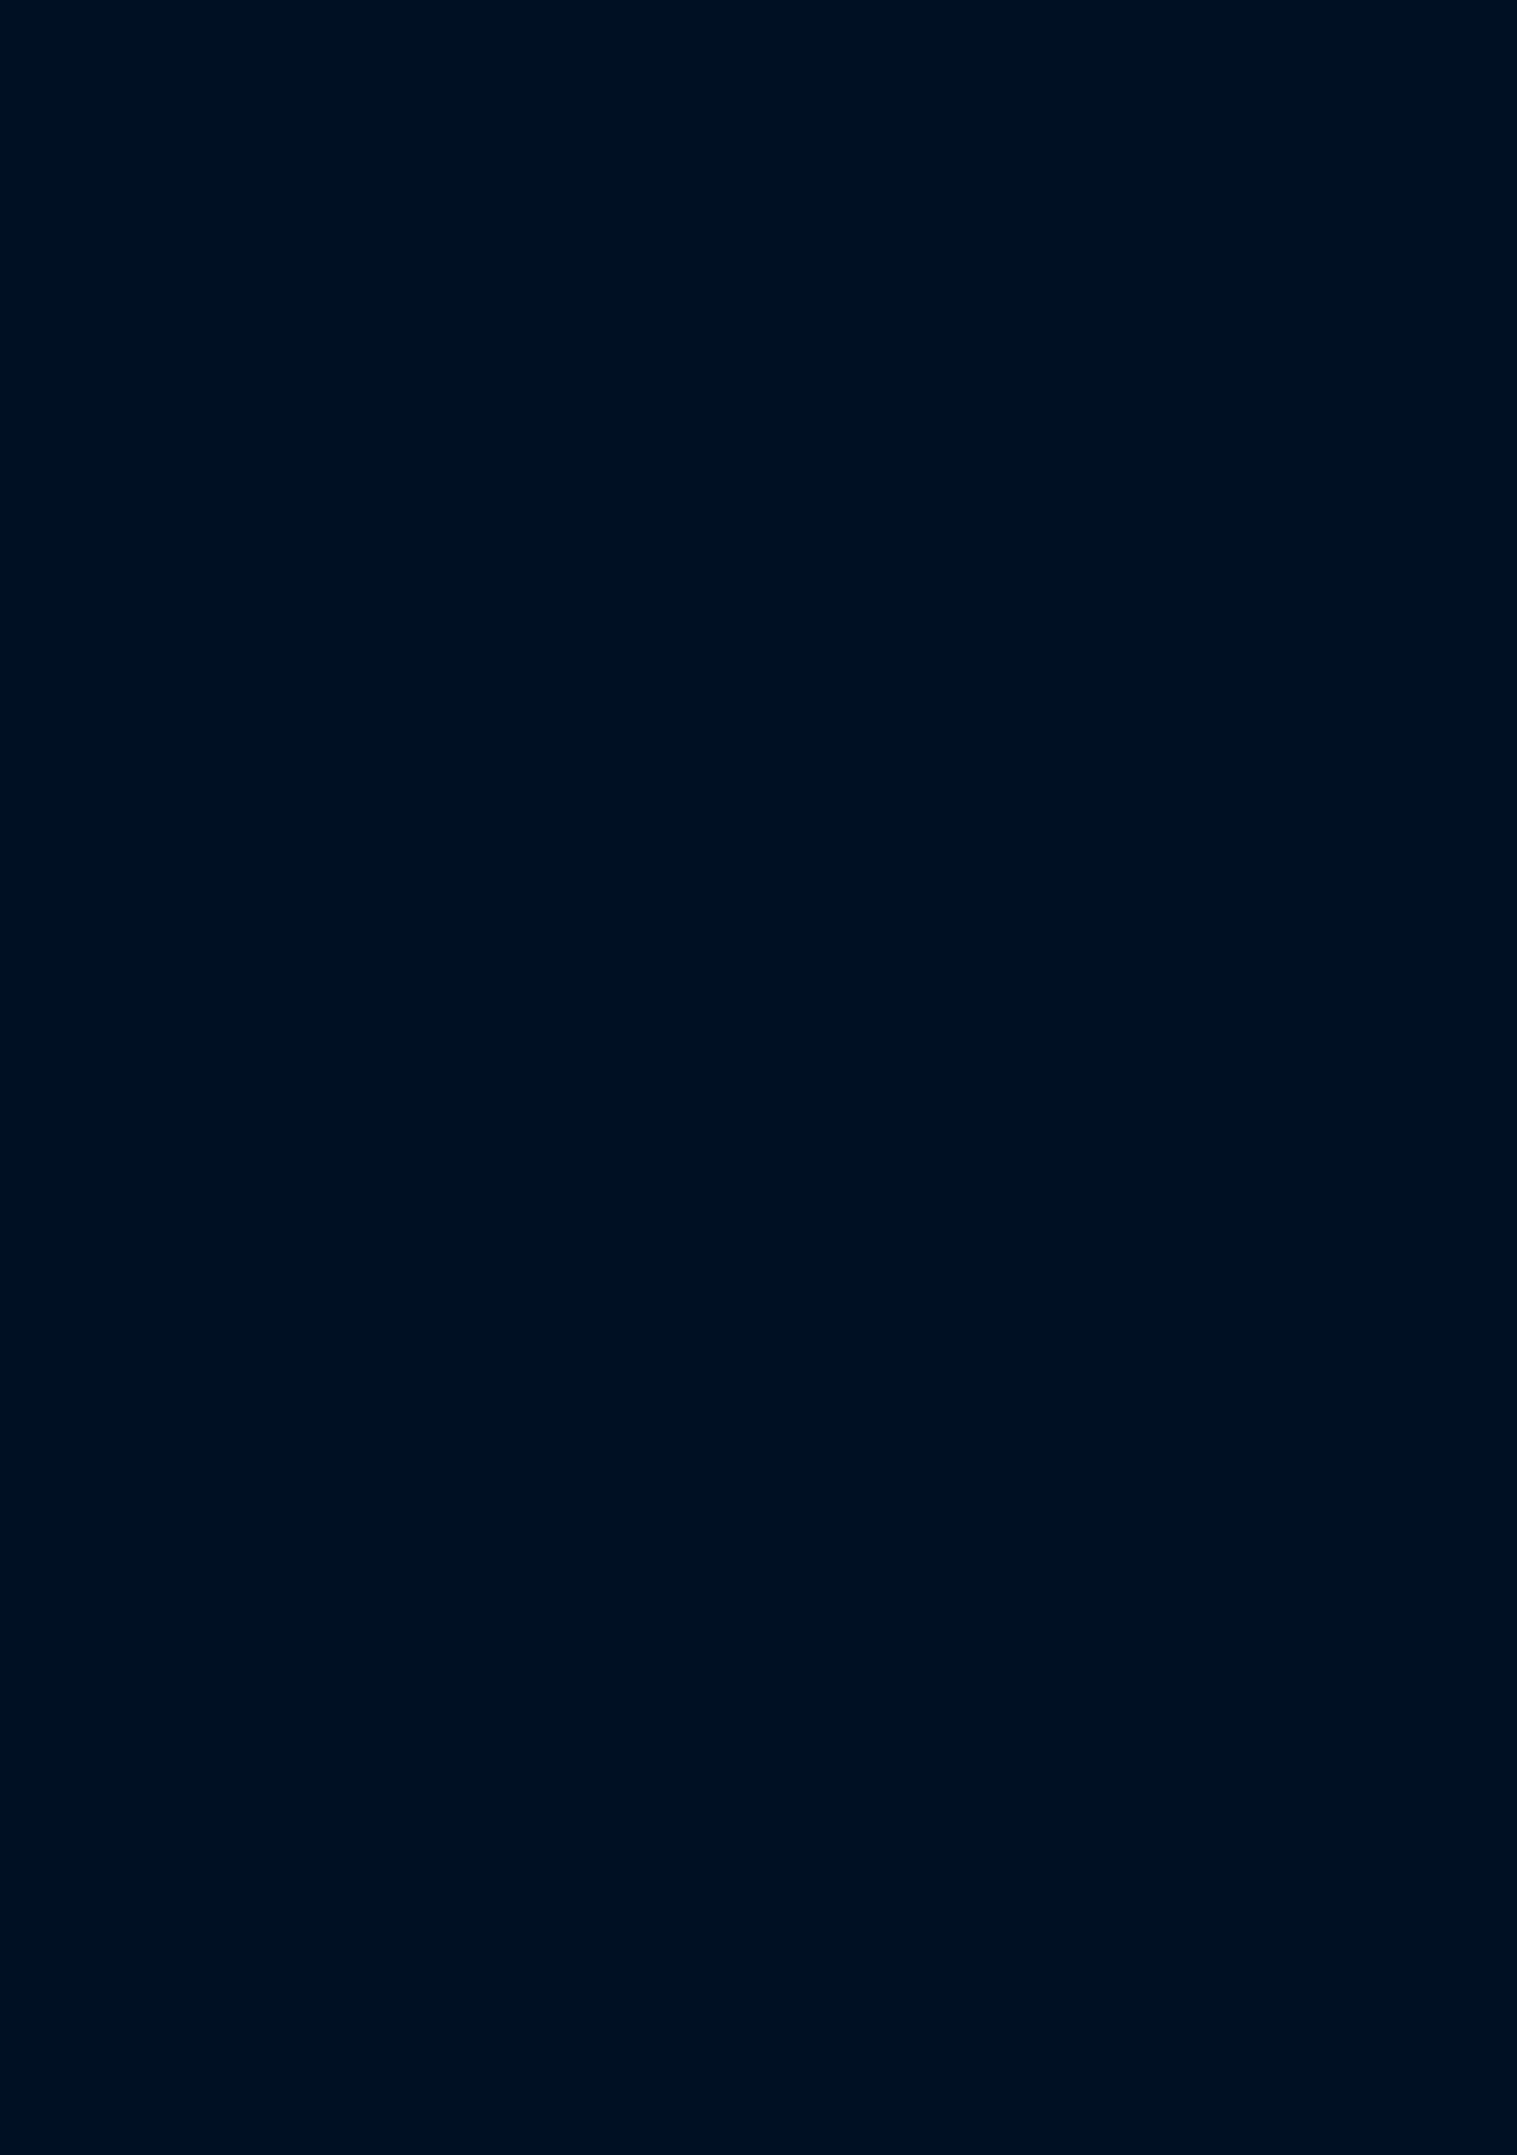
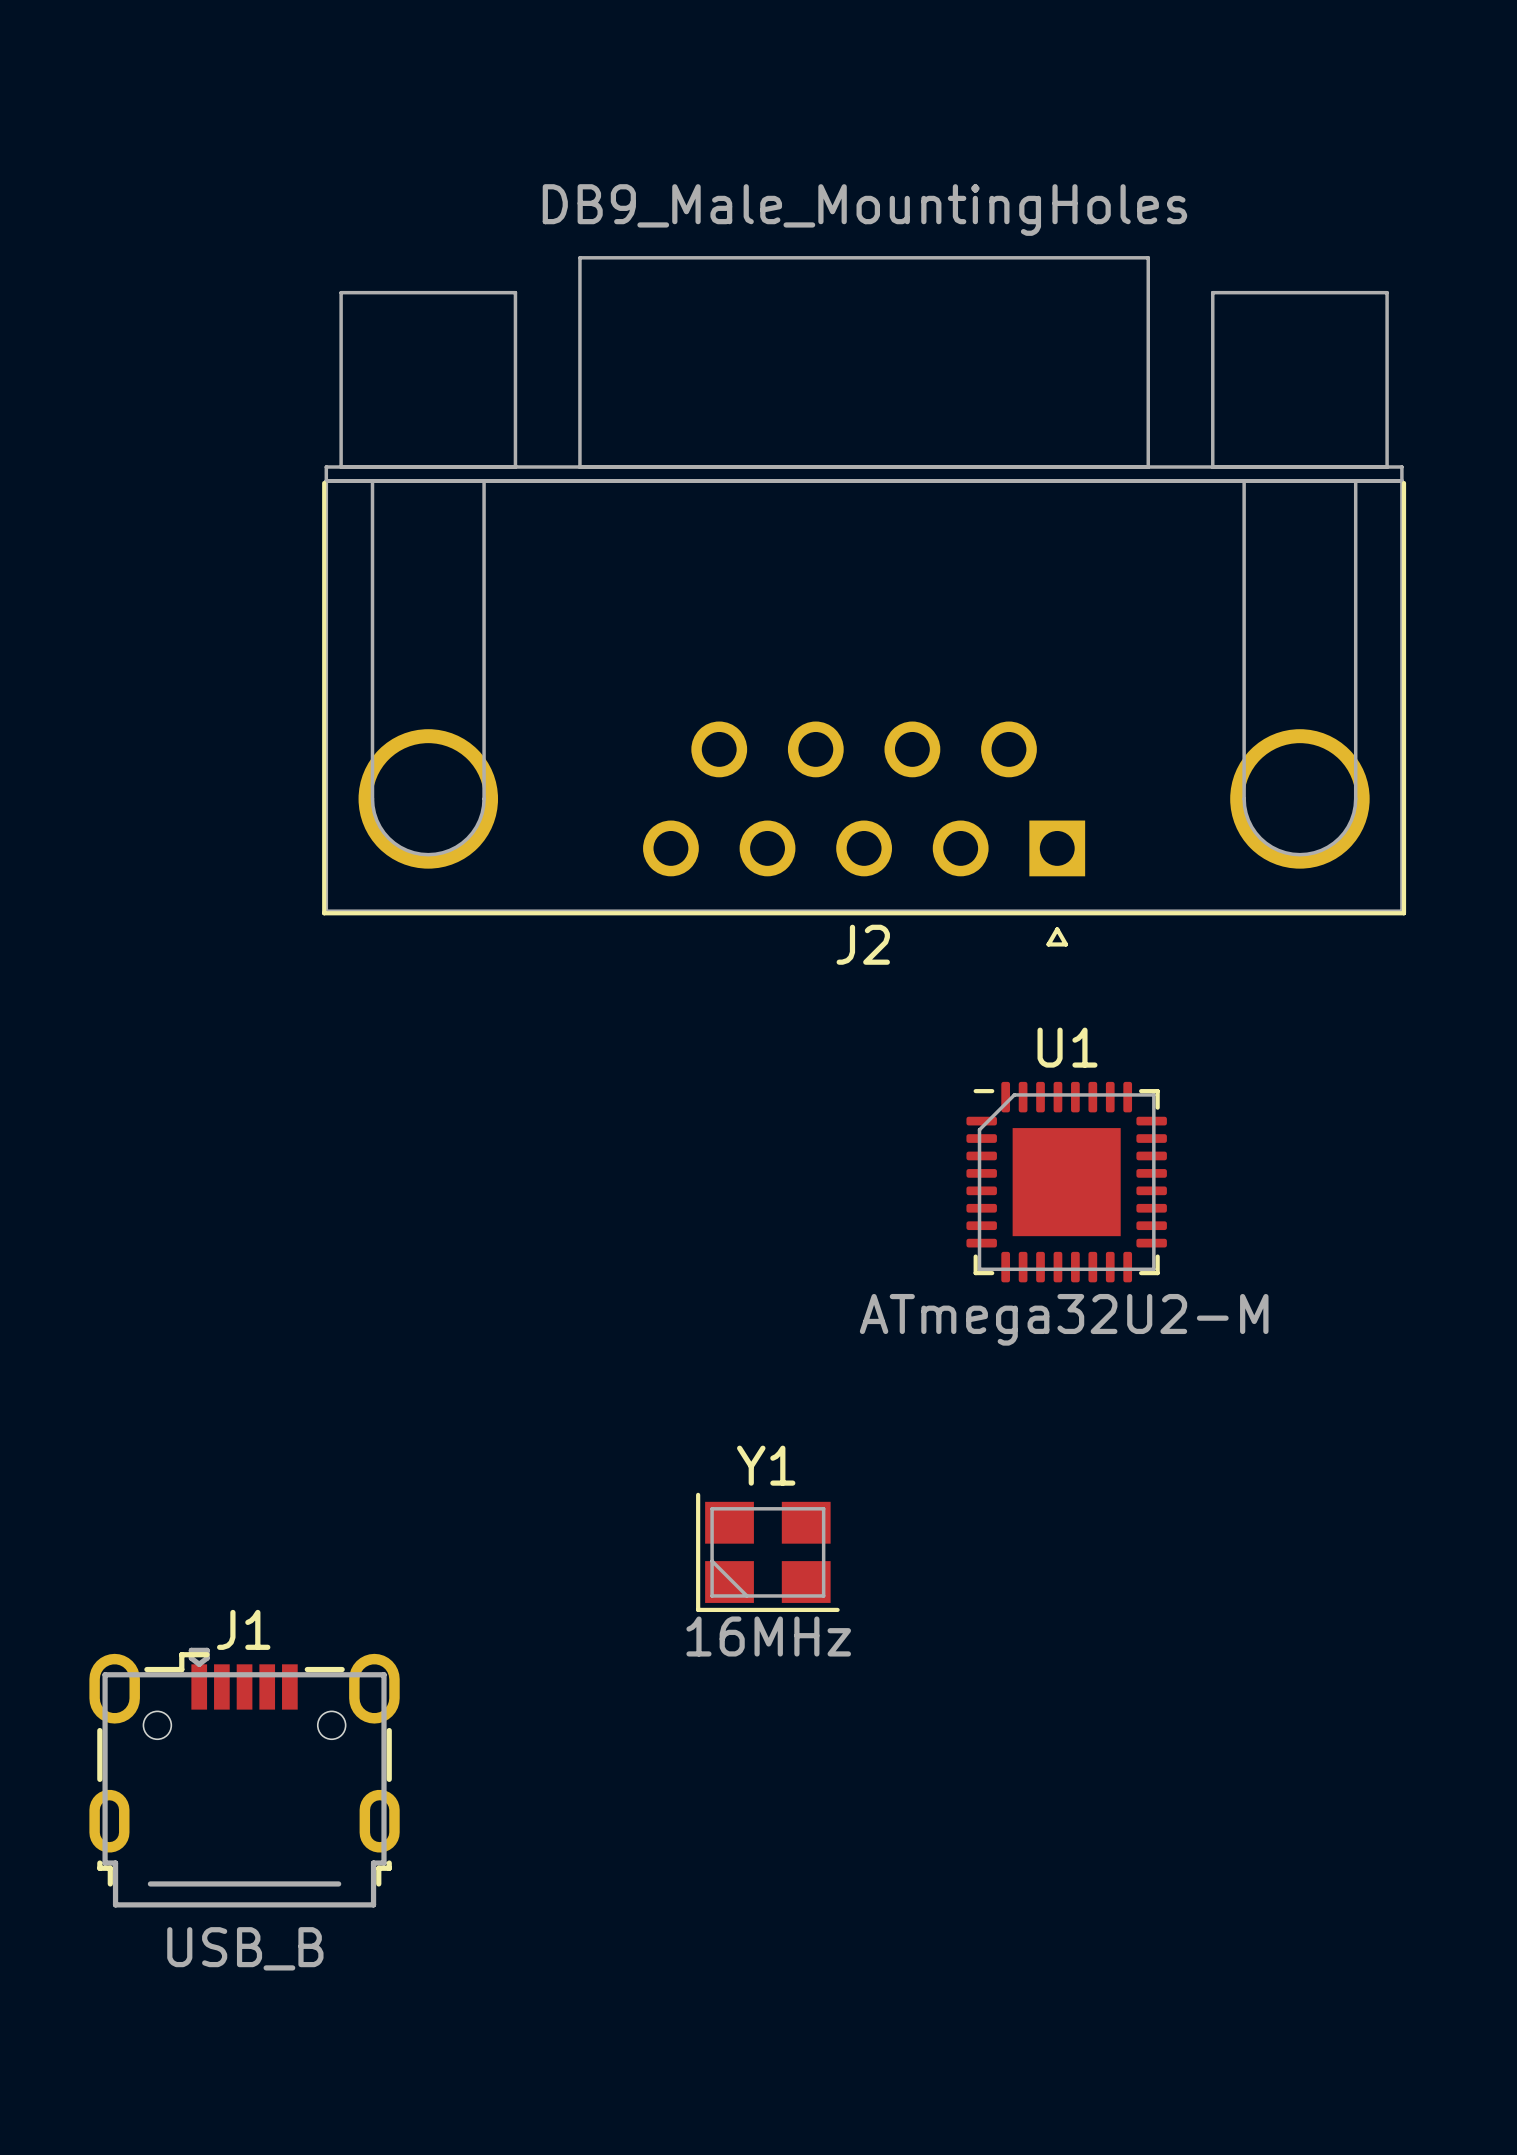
J2: none -> DB9_Male_MountingHoles (864, 601)
U1: none -> ATmega32U2-M (1066, 1182)
Y1: none -> 16MHz (767, 1552)
J1: none -> USB_B (244, 1777)

